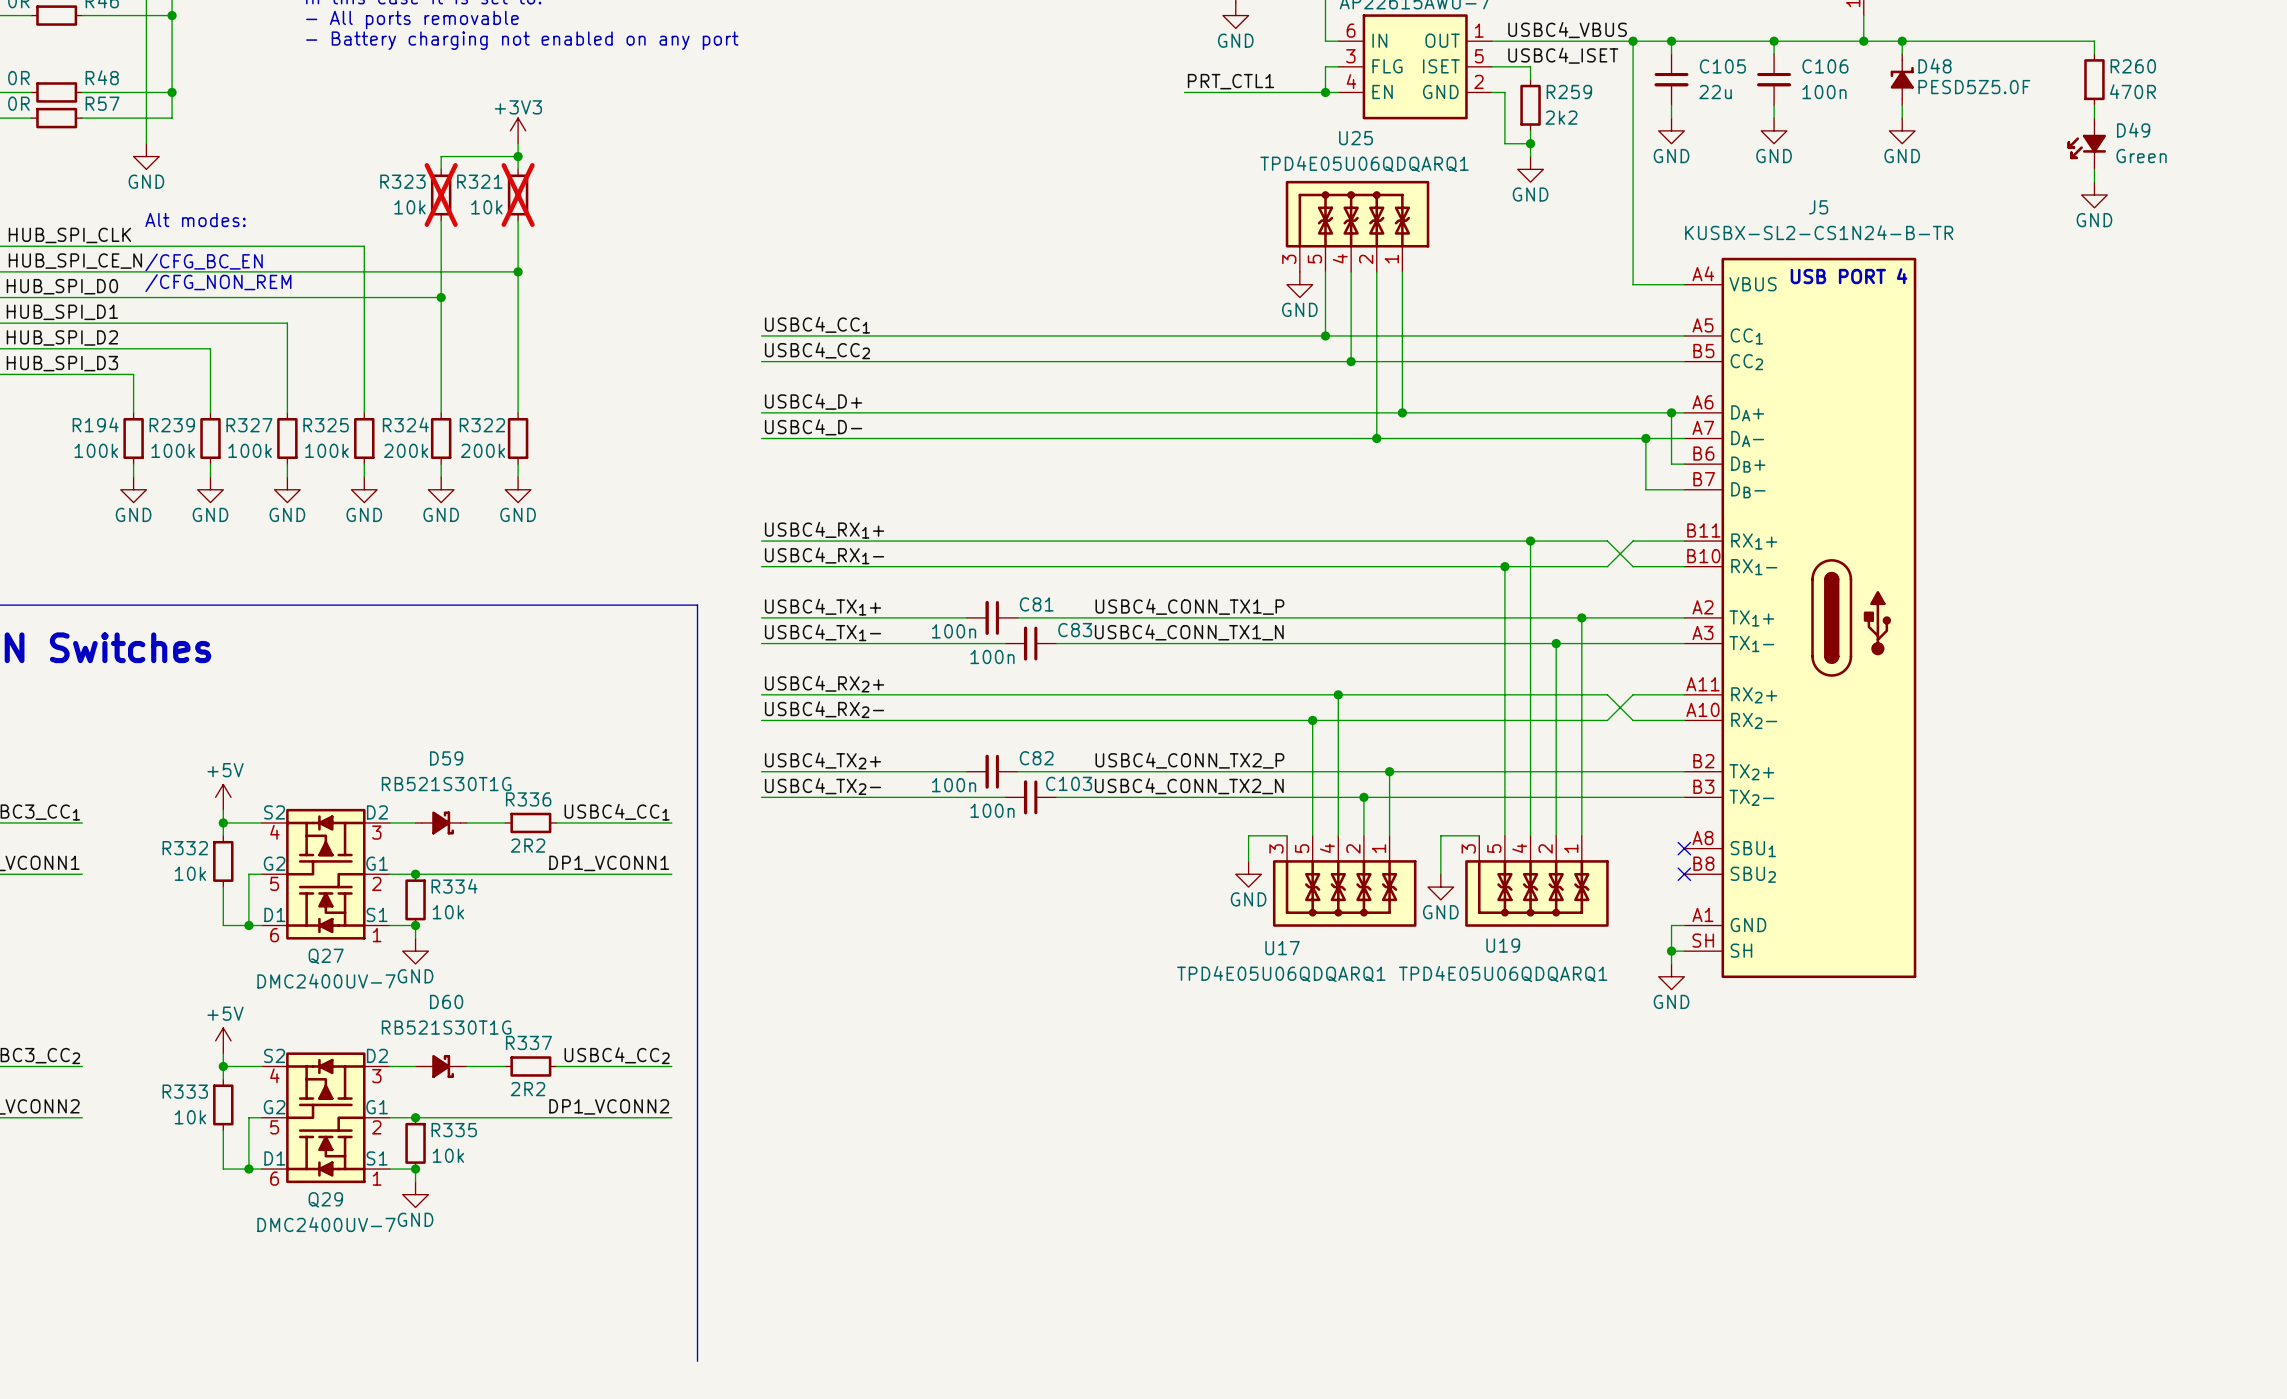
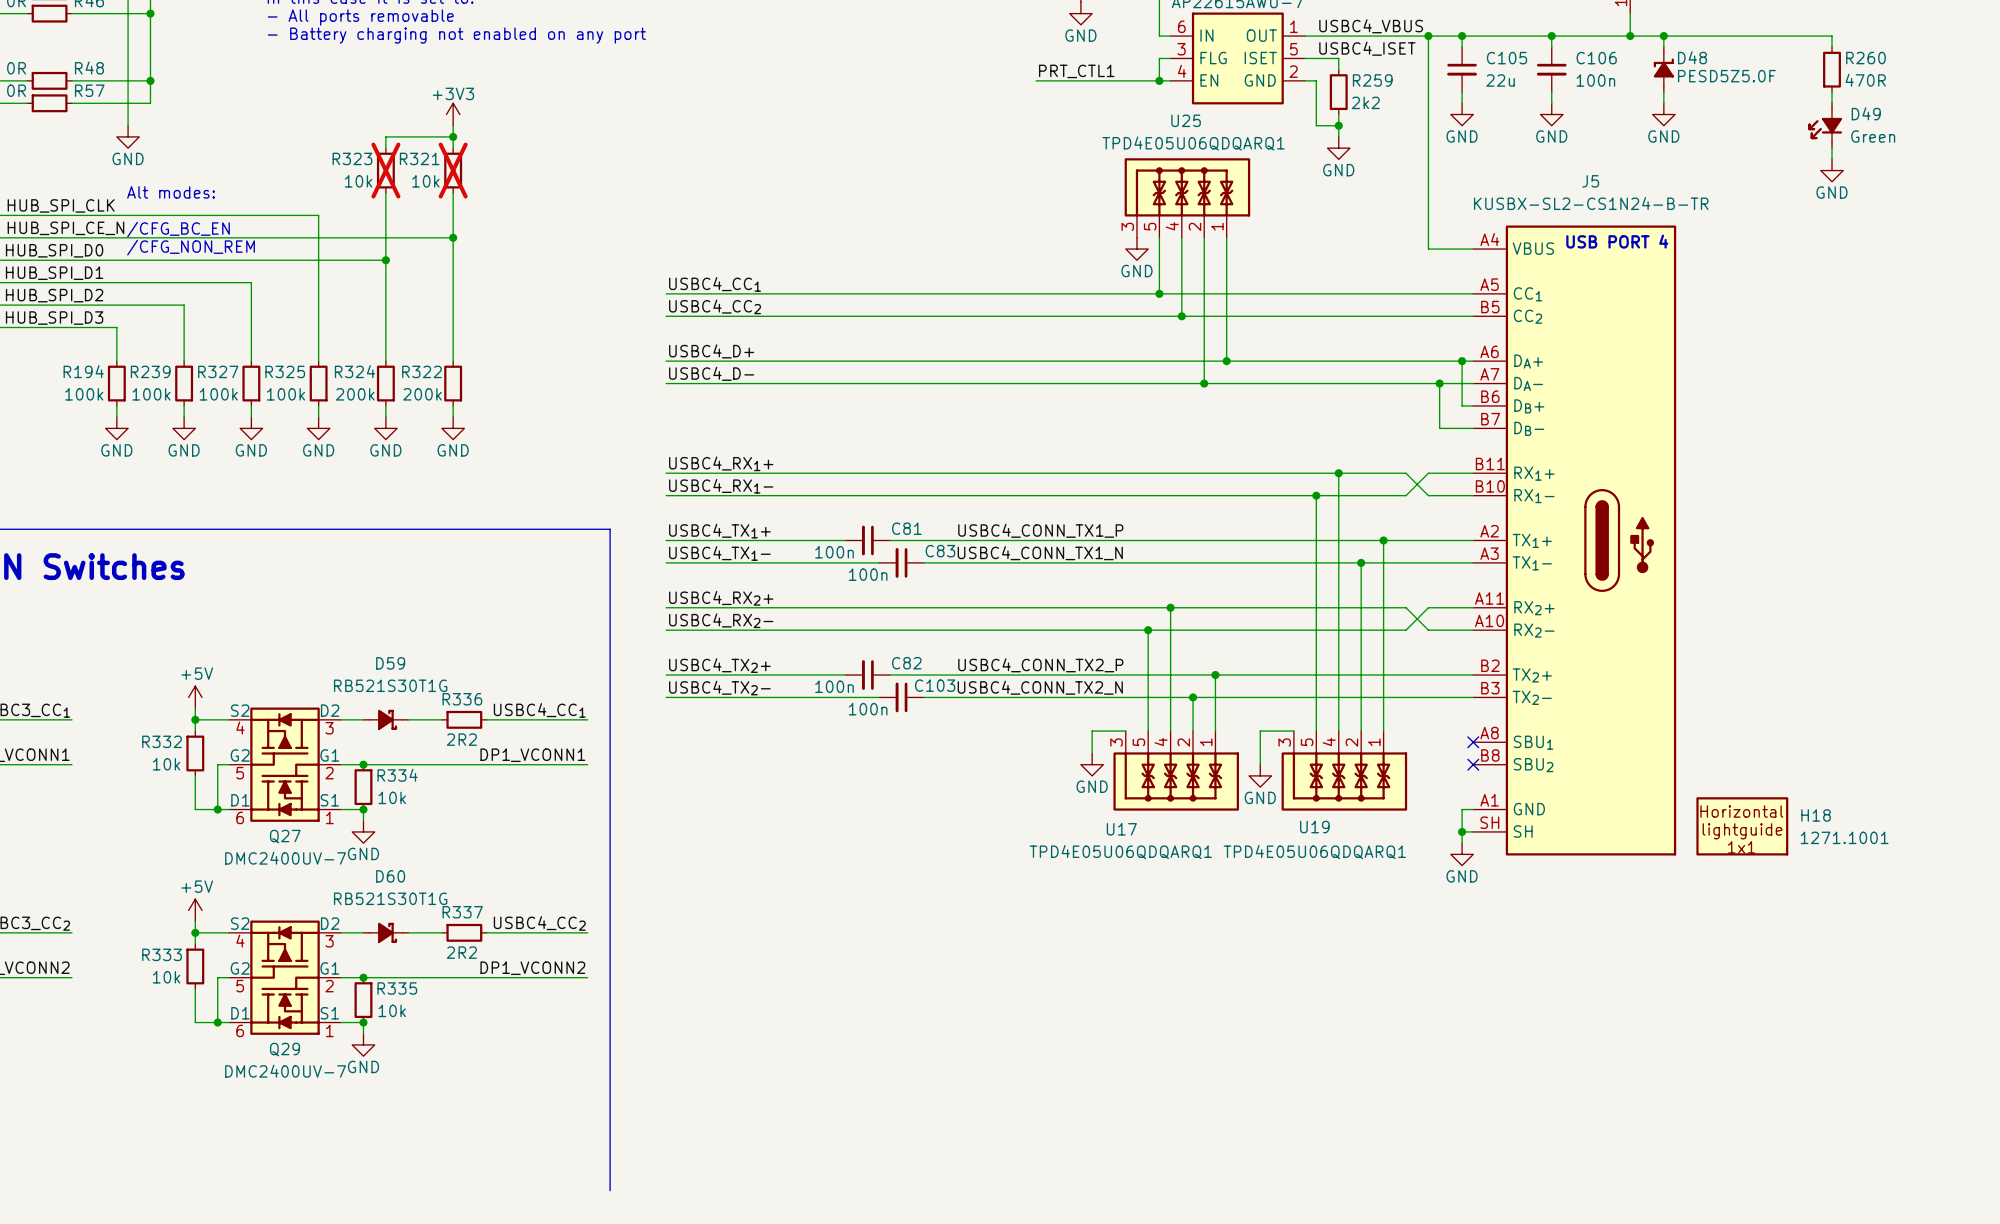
H18: none -> (1742, 826)

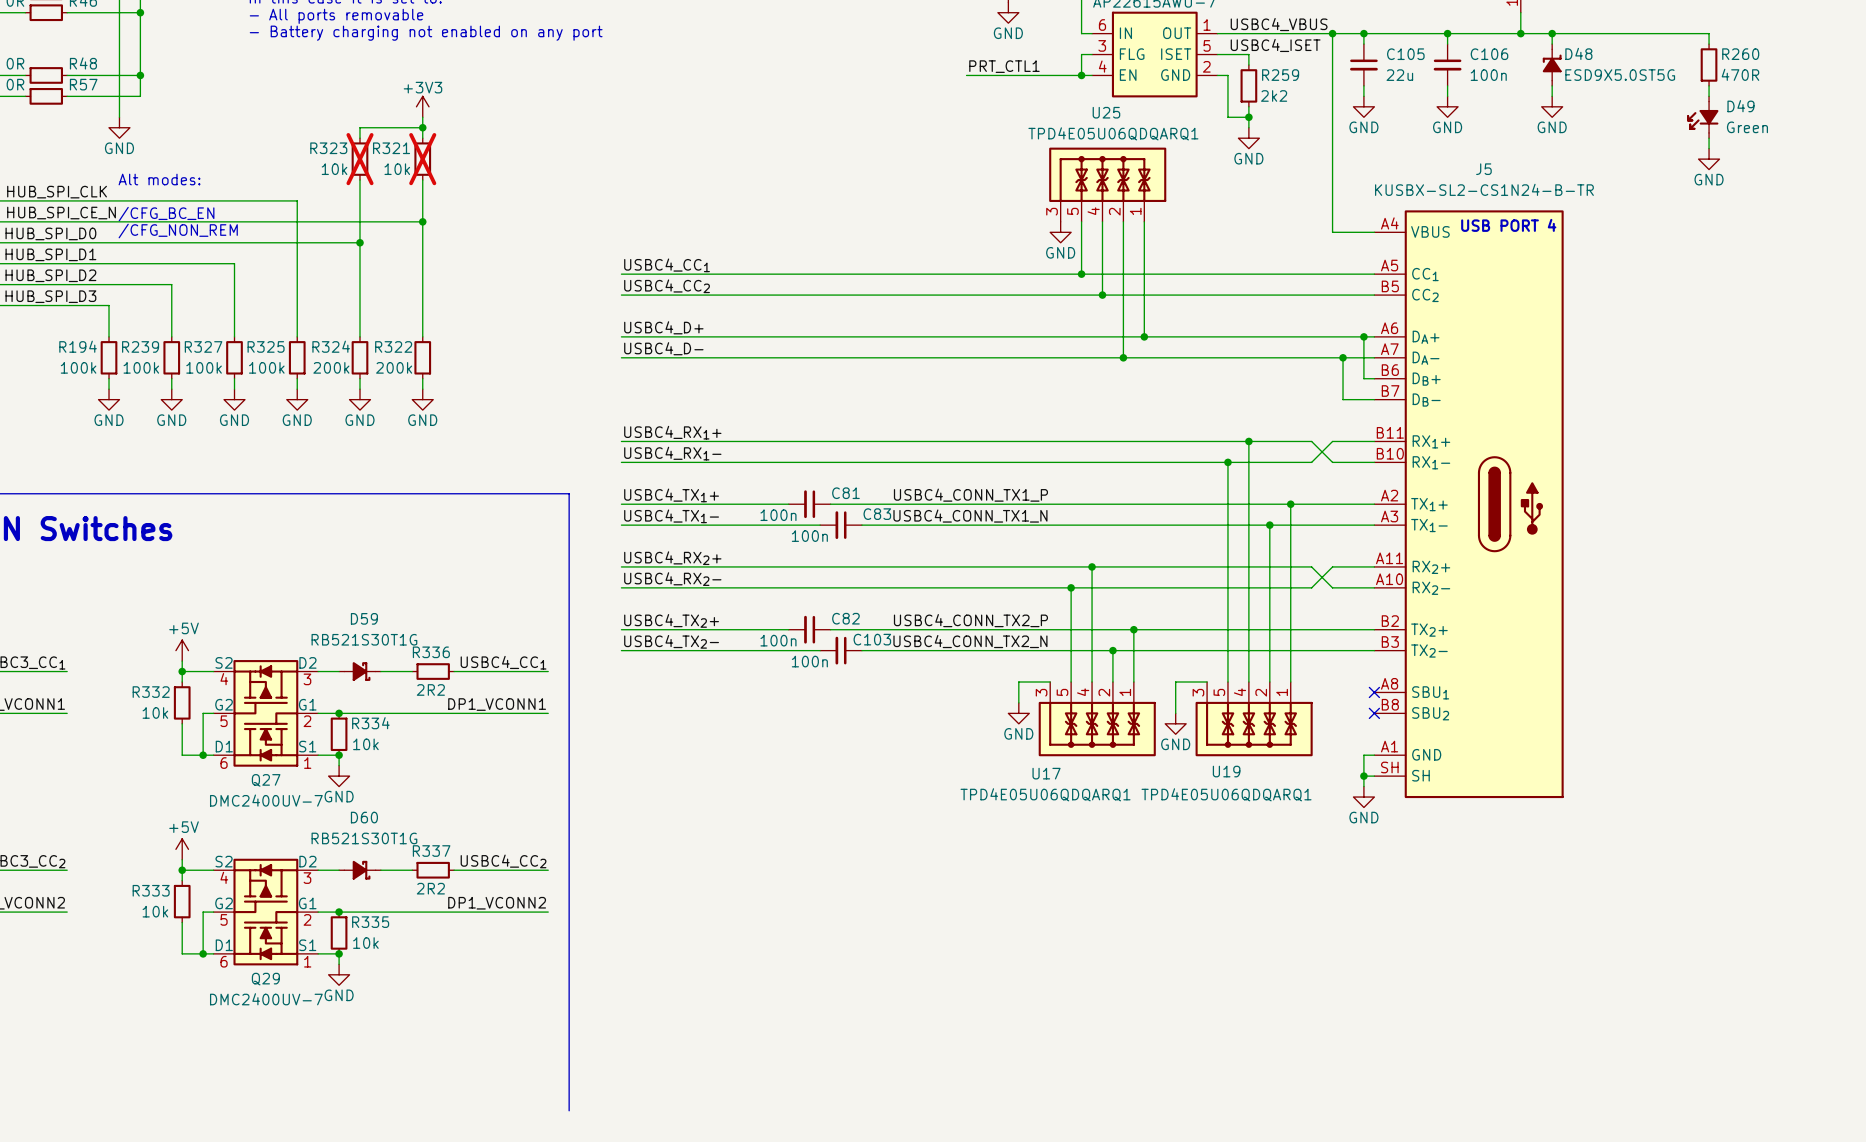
D48 text: PESD5Z5.0F (1726, 76) -> ESD9X5.0ST5G (1620, 75)
H18: (1742, 826) -> none

